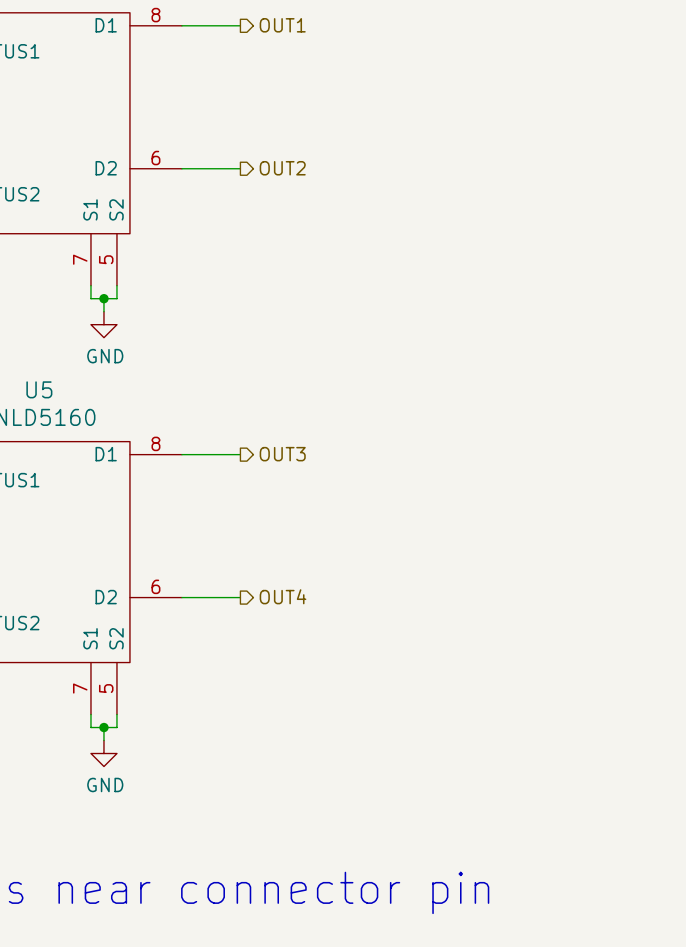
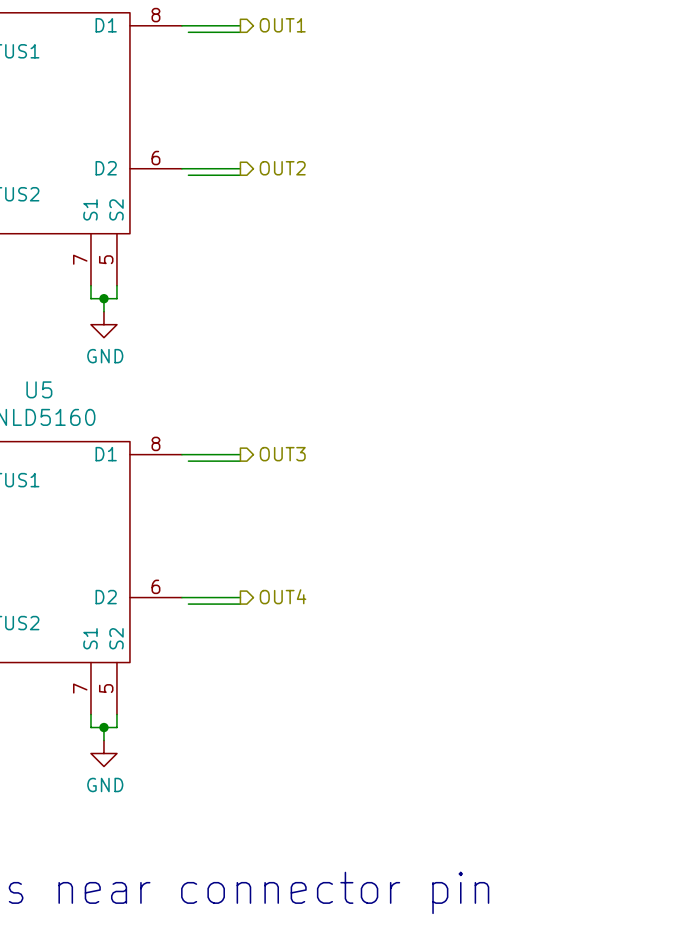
wire: none -> (188, 32) (240, 32)
wire: none -> (188, 175) (240, 175)
wire: none -> (188, 461) (240, 461)
wire: none -> (188, 604) (240, 604)

